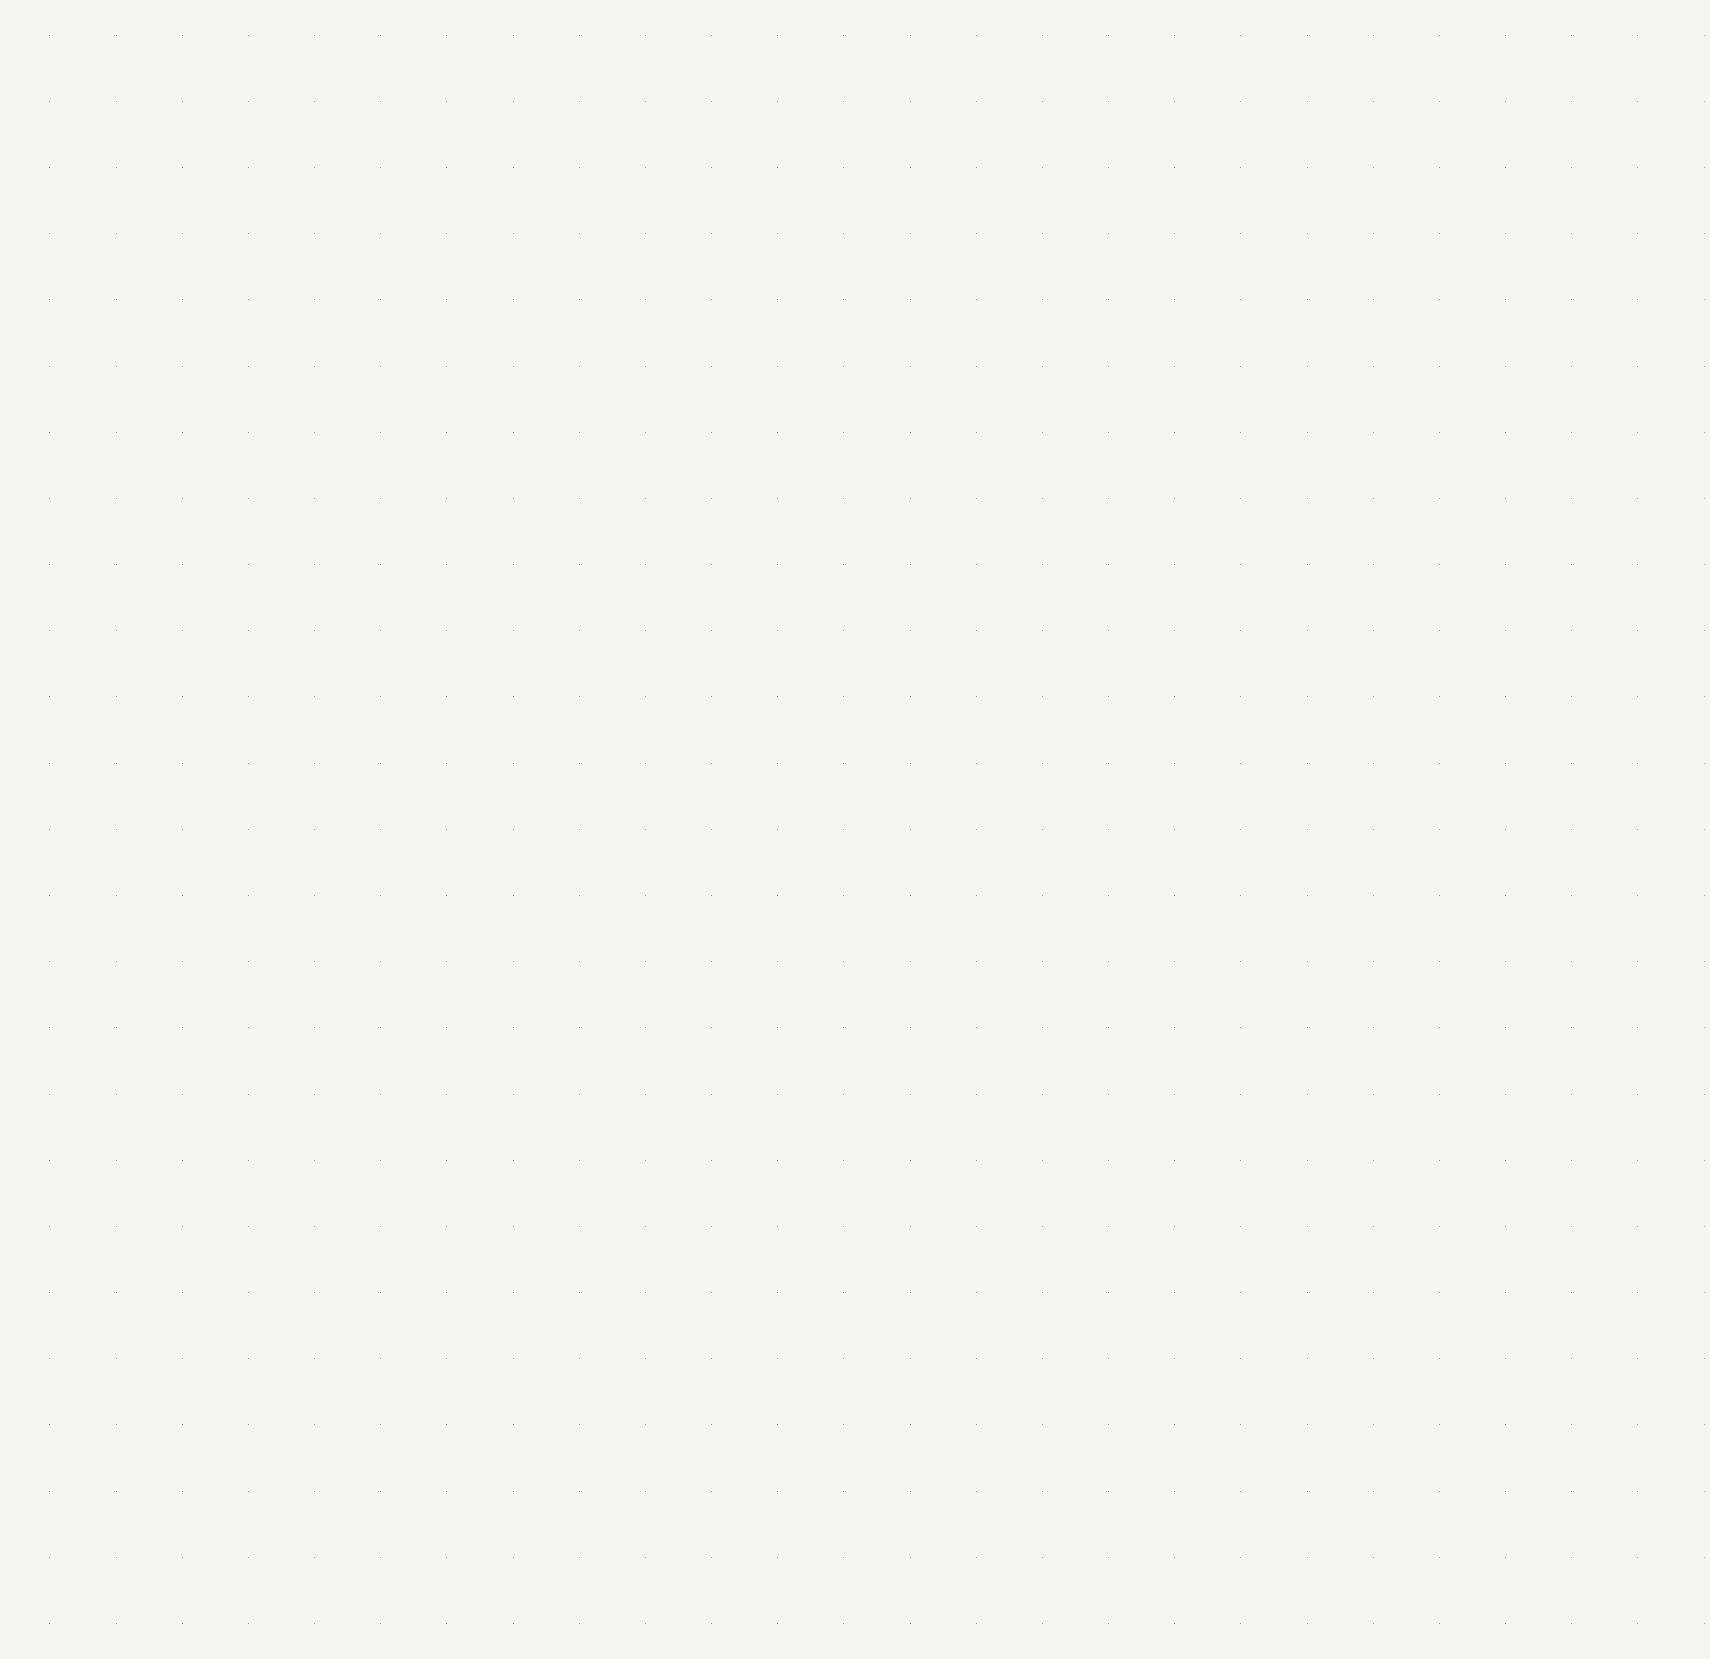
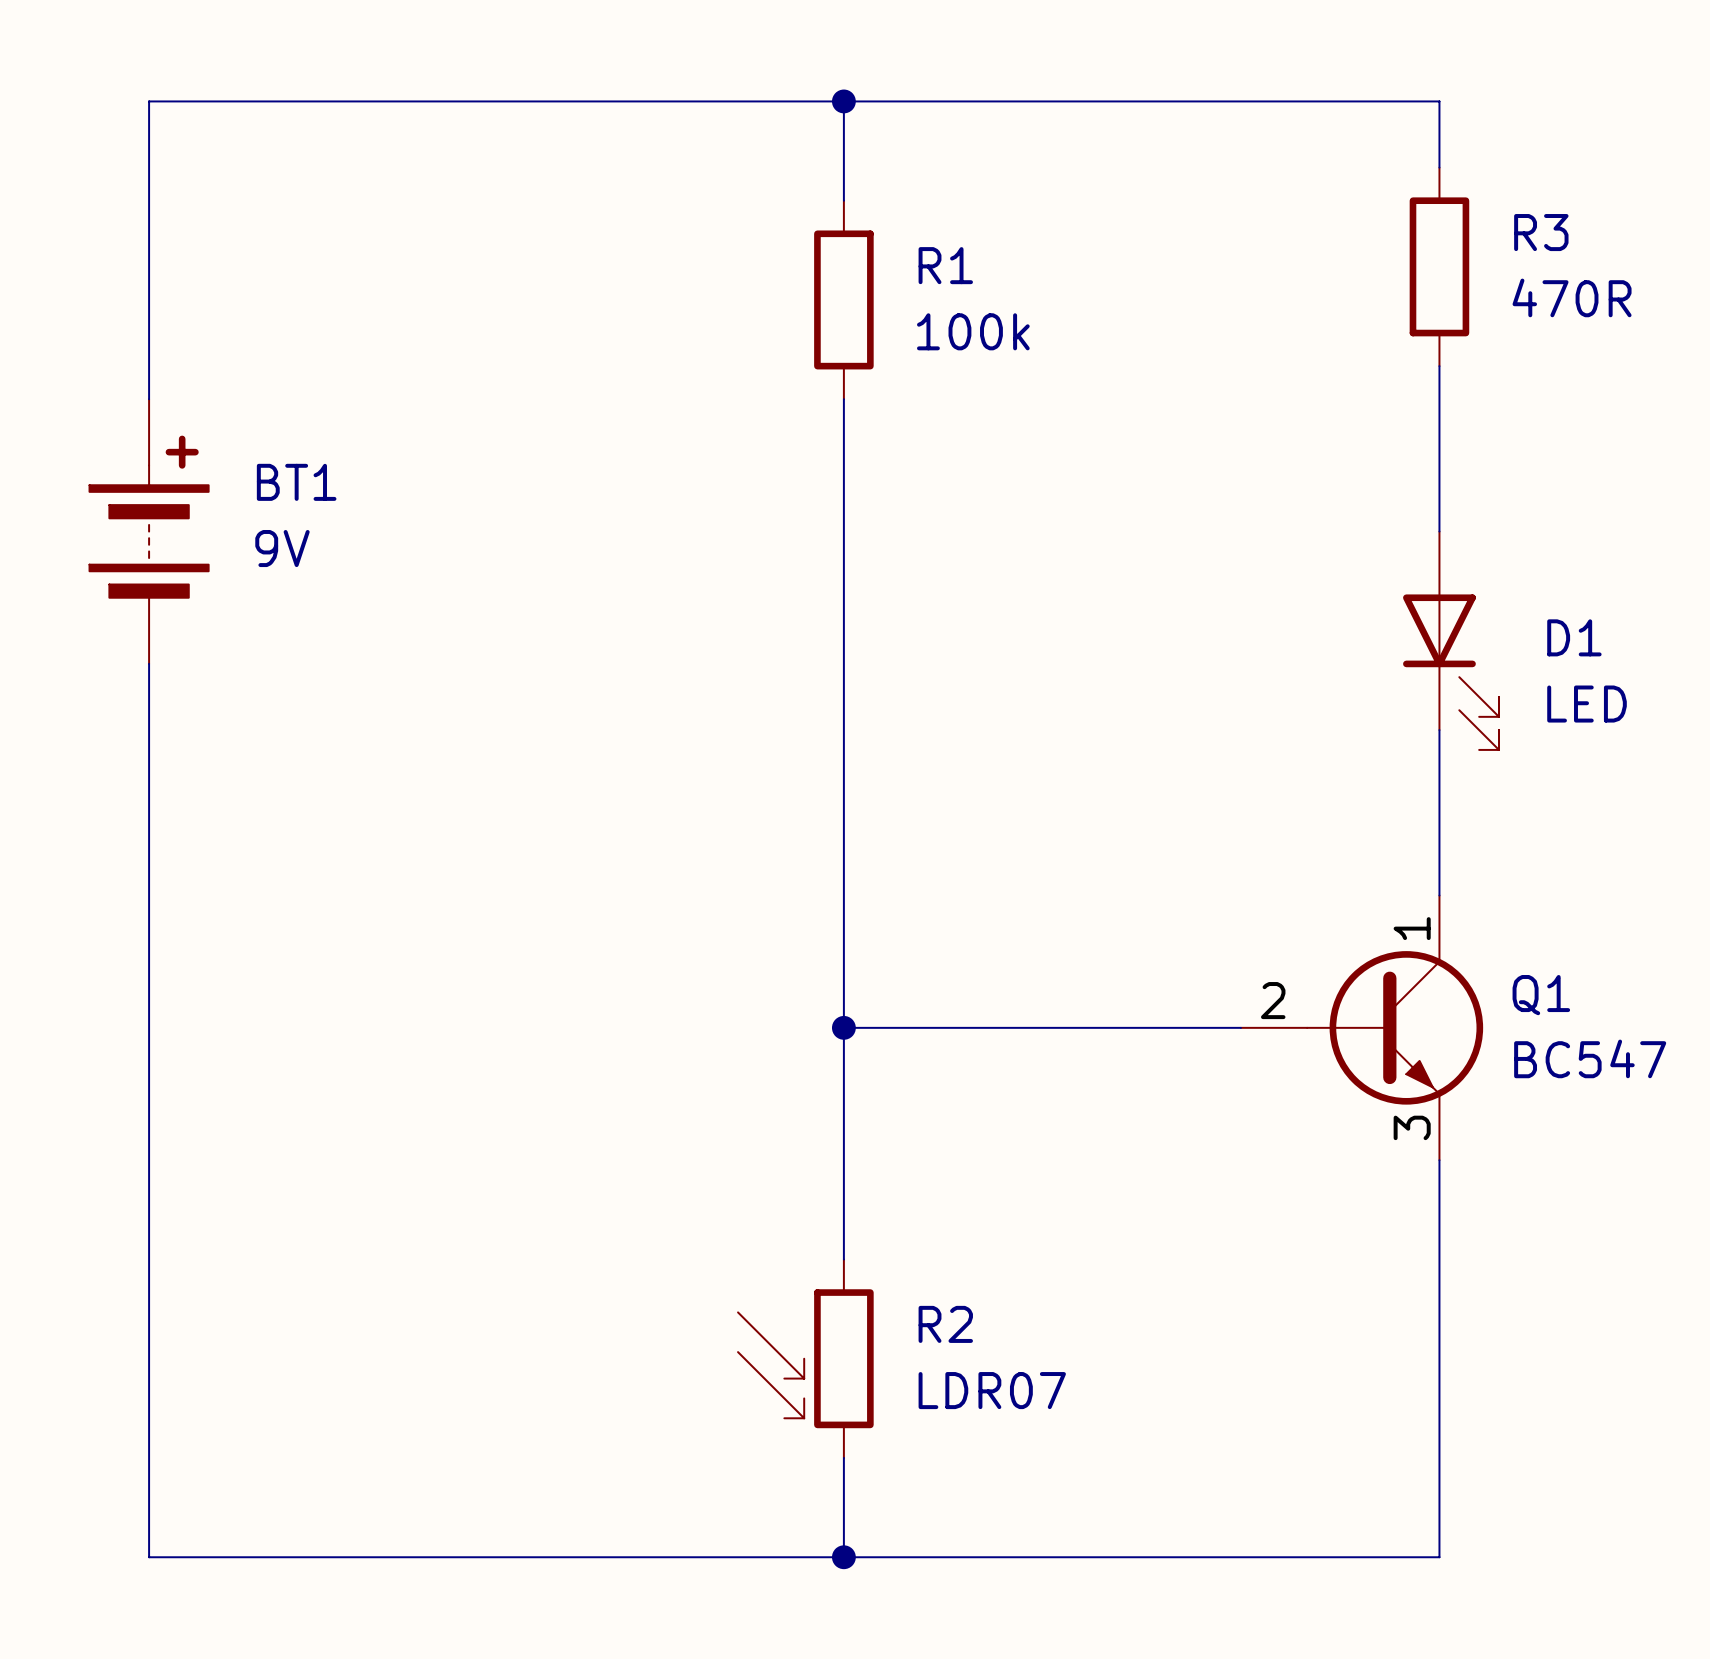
wire: none -> (843, 101) (843, 200)
junction: none -> (843, 101)
wire: none -> (1439, 167) (1439, 101) (149, 101) (149, 399)
R3: none -> 470R (1439, 266)
R1: none -> 100k (843, 299)
wire: none -> (1439, 366) (1439, 531)
wire: none -> (843, 399) (843, 1259)
BT1: none -> 9V (149, 531)
D1: none -> LED (1451, 640)
wire: none -> (149, 663) (149, 1557) (1439, 1557) (1439, 1160)
wire: none -> (1439, 730) (1439, 895)
wire: none -> (843, 1027) (1240, 1027)
junction: none -> (843, 1027)
Q1: none -> BC547 (1362, 1027)
R2: none -> LDR07 (805, 1358)
wire: none -> (843, 1457) (843, 1557)
junction: none -> (843, 1557)

